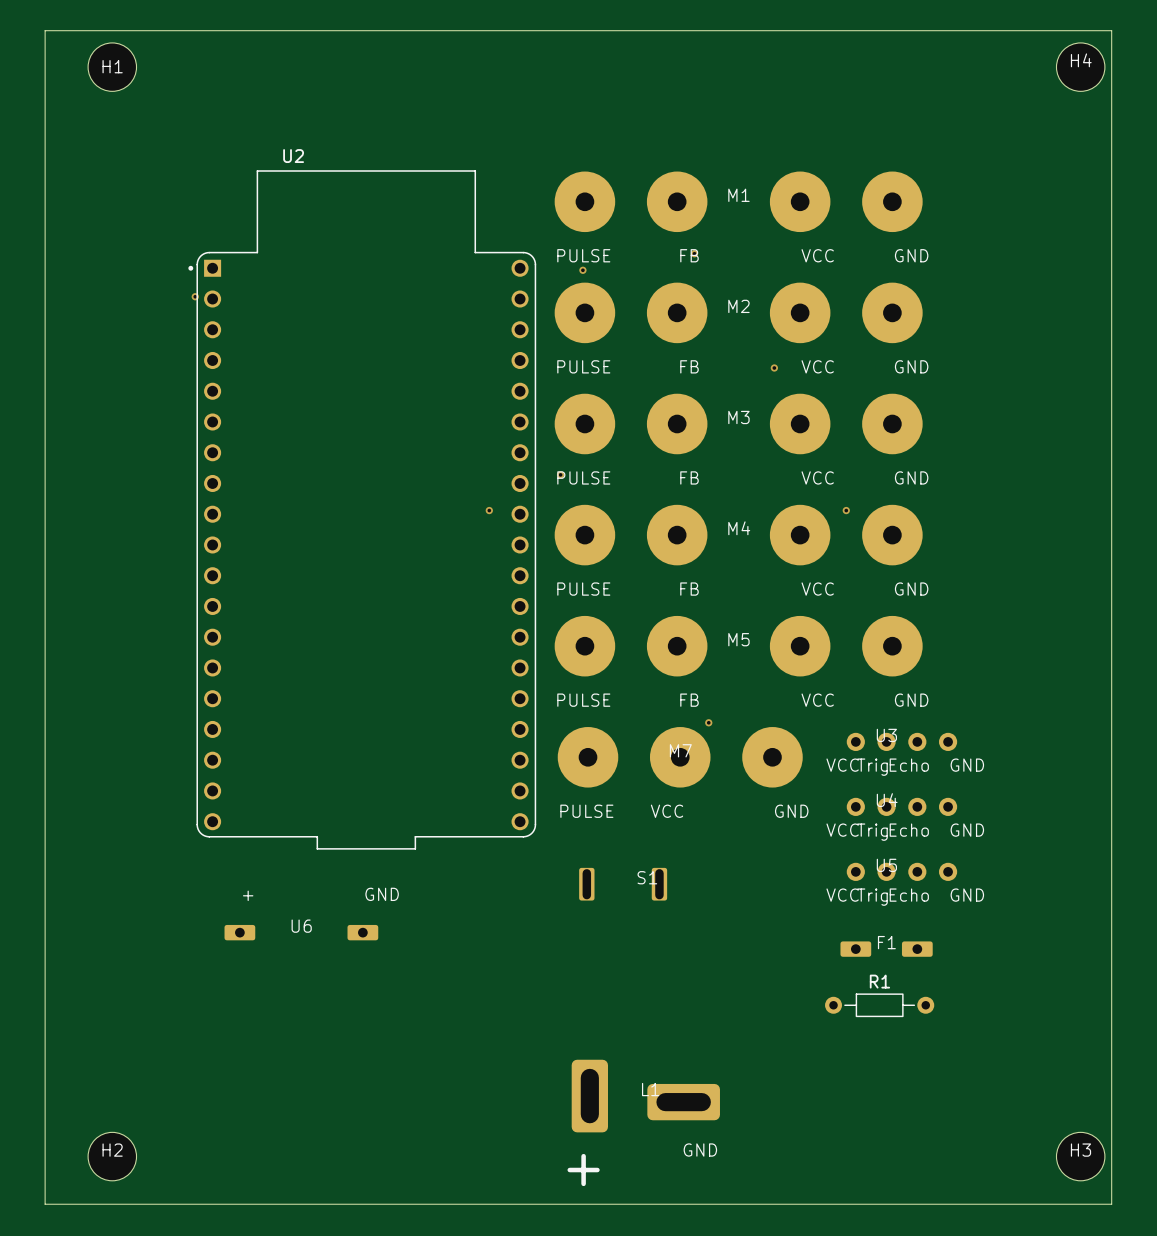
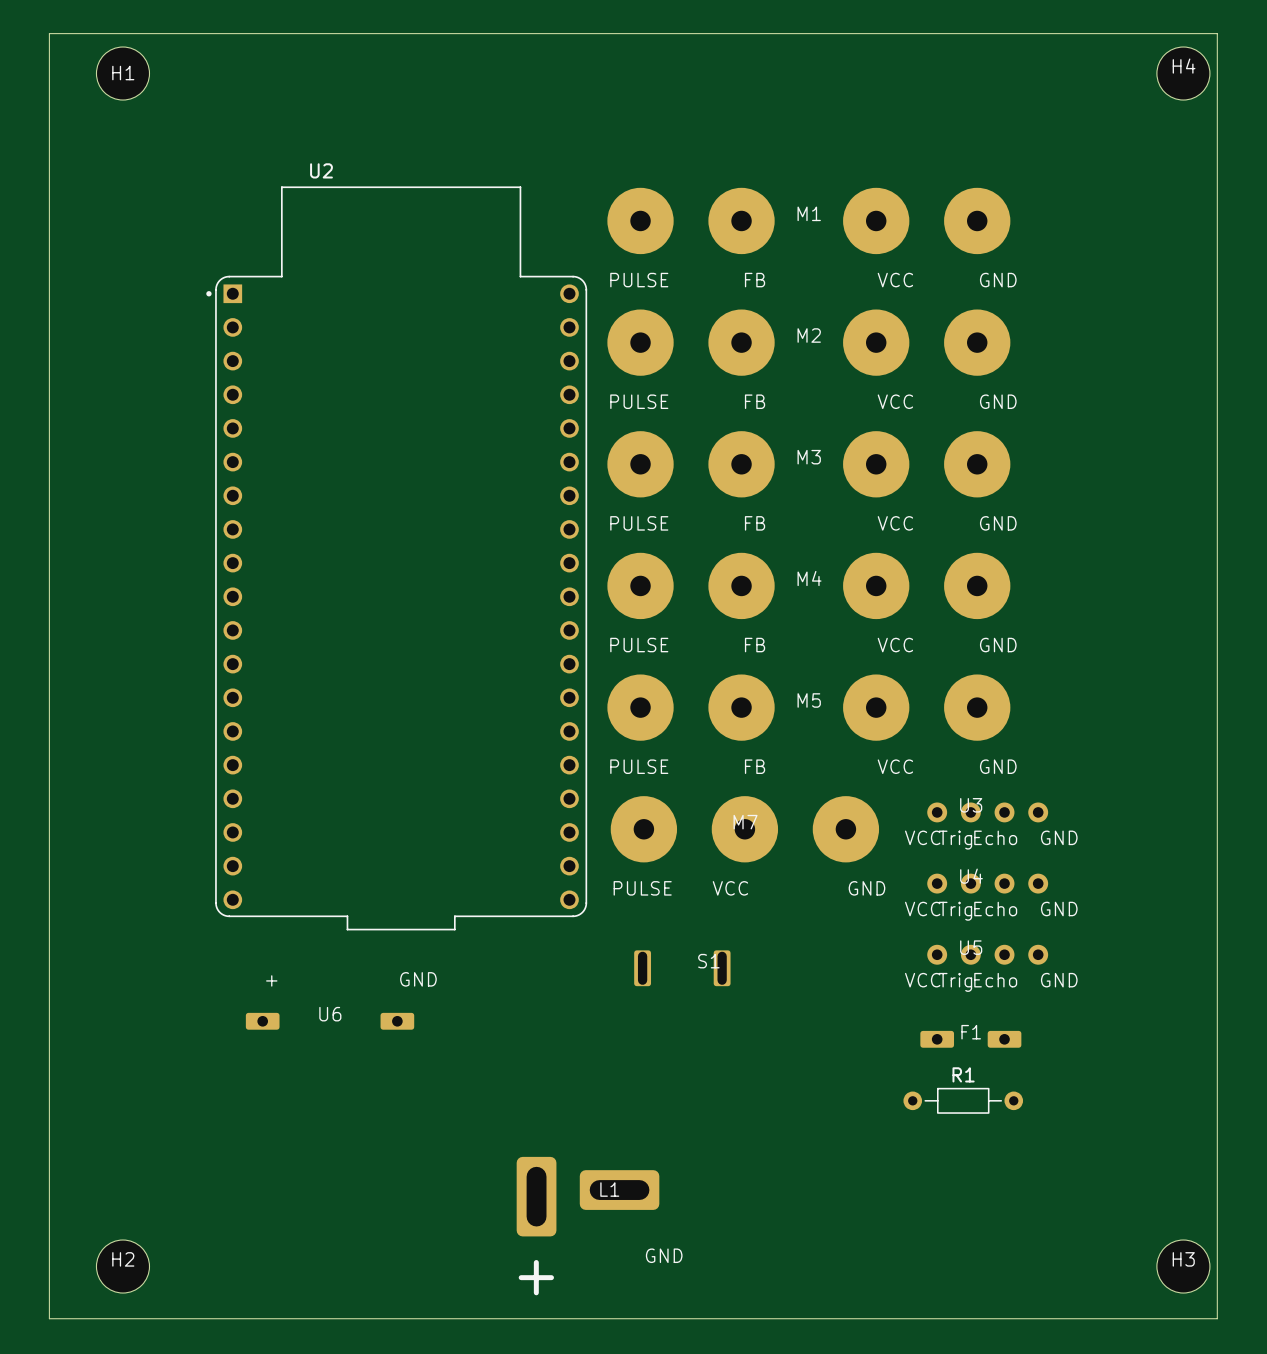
via: (694, 253) -> none
via: (582, 270) -> none
via: (195, 296) -> none
via: (774, 367) -> none
via: (560, 474) -> none
via: (489, 510) -> none
via: (846, 510) -> none
via: (708, 722) -> none
L1 footprint: [571, 1059, 720, 1133] -> [516, 1156, 660, 1237]

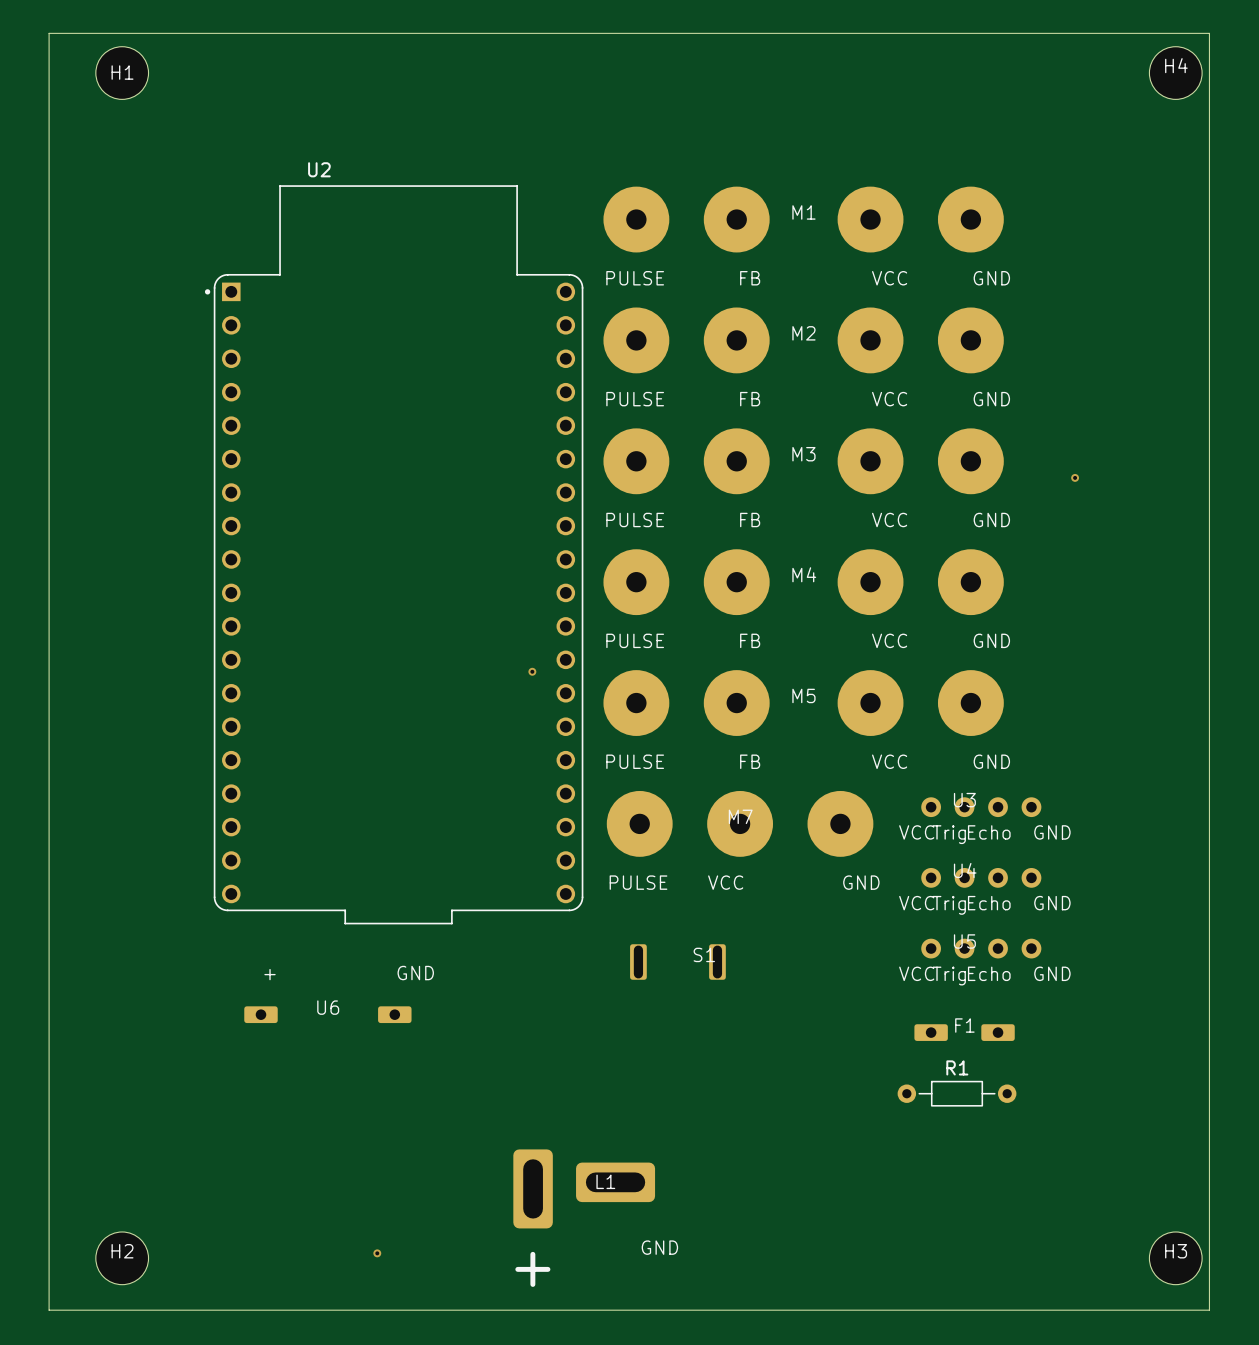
via: none -> (1075, 477)
via: none -> (532, 671)
via: none -> (377, 1253)

